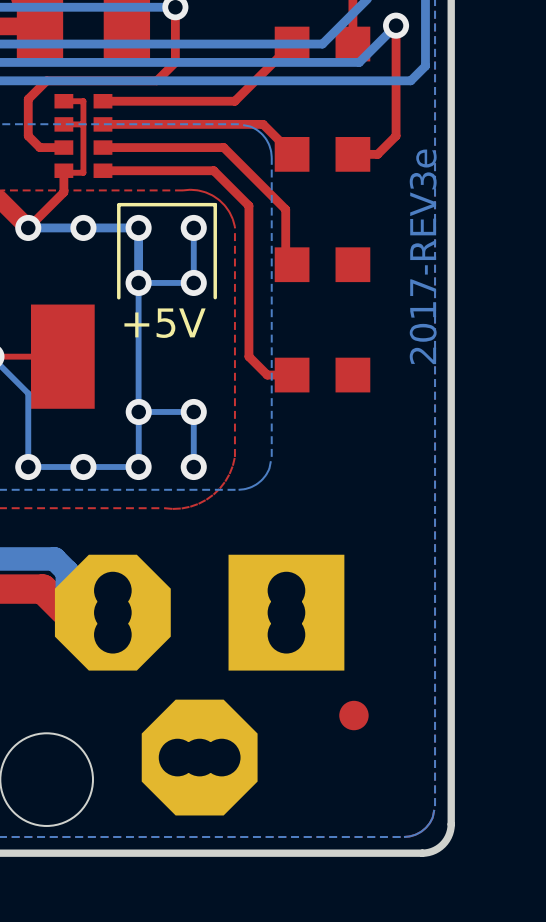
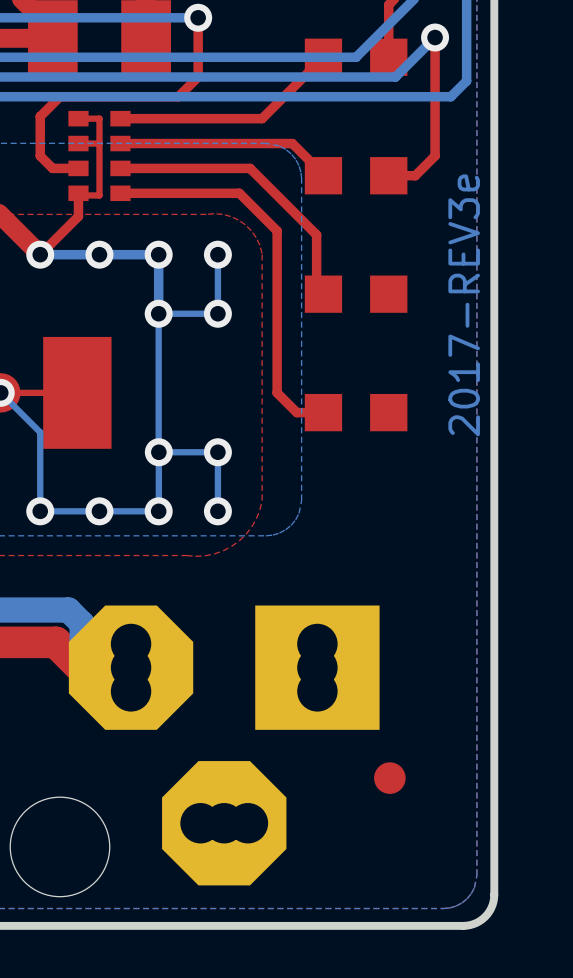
line: (118, 204) (118, 297) -> none
line: (119, 204) (215, 204) (215, 297) -> none
text: +5V (165, 323) -> none

